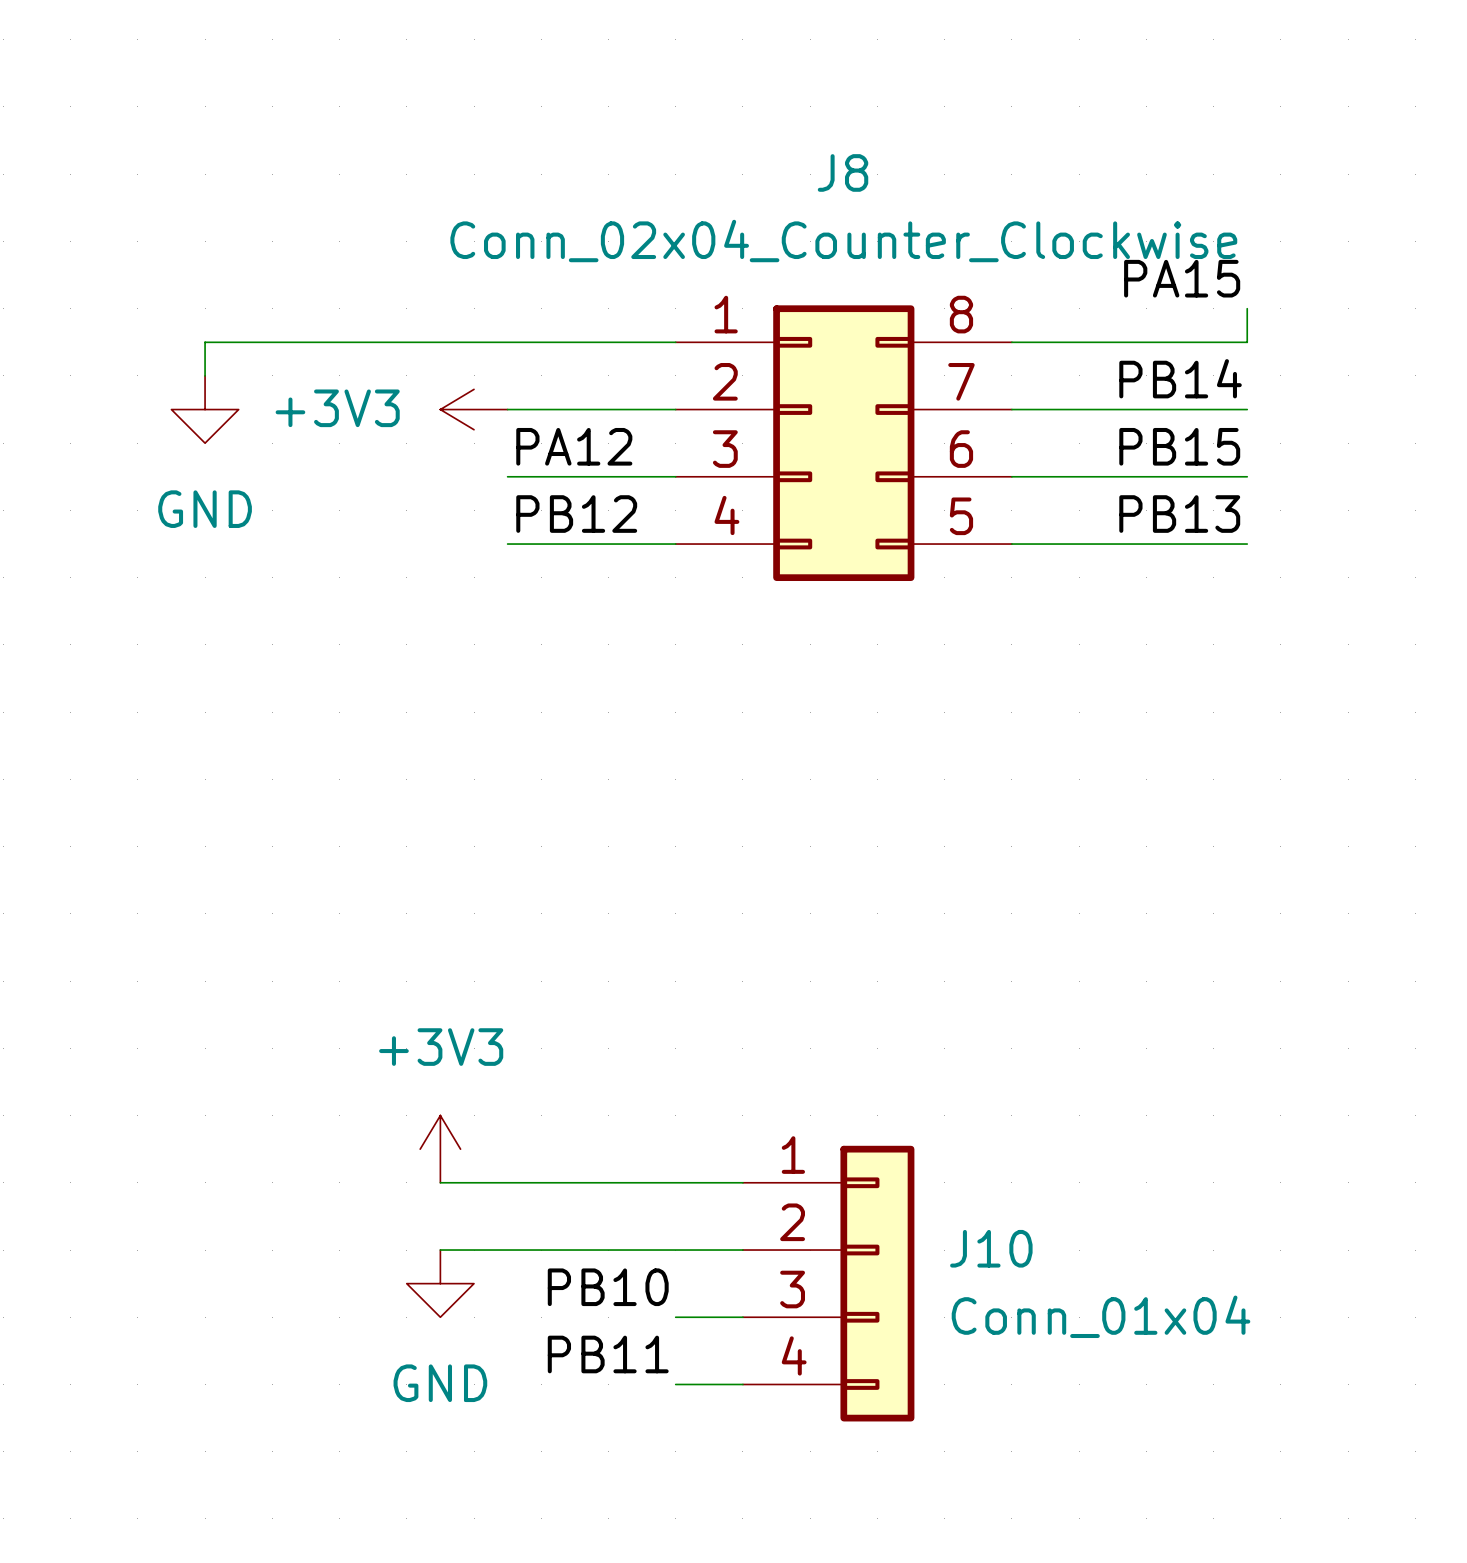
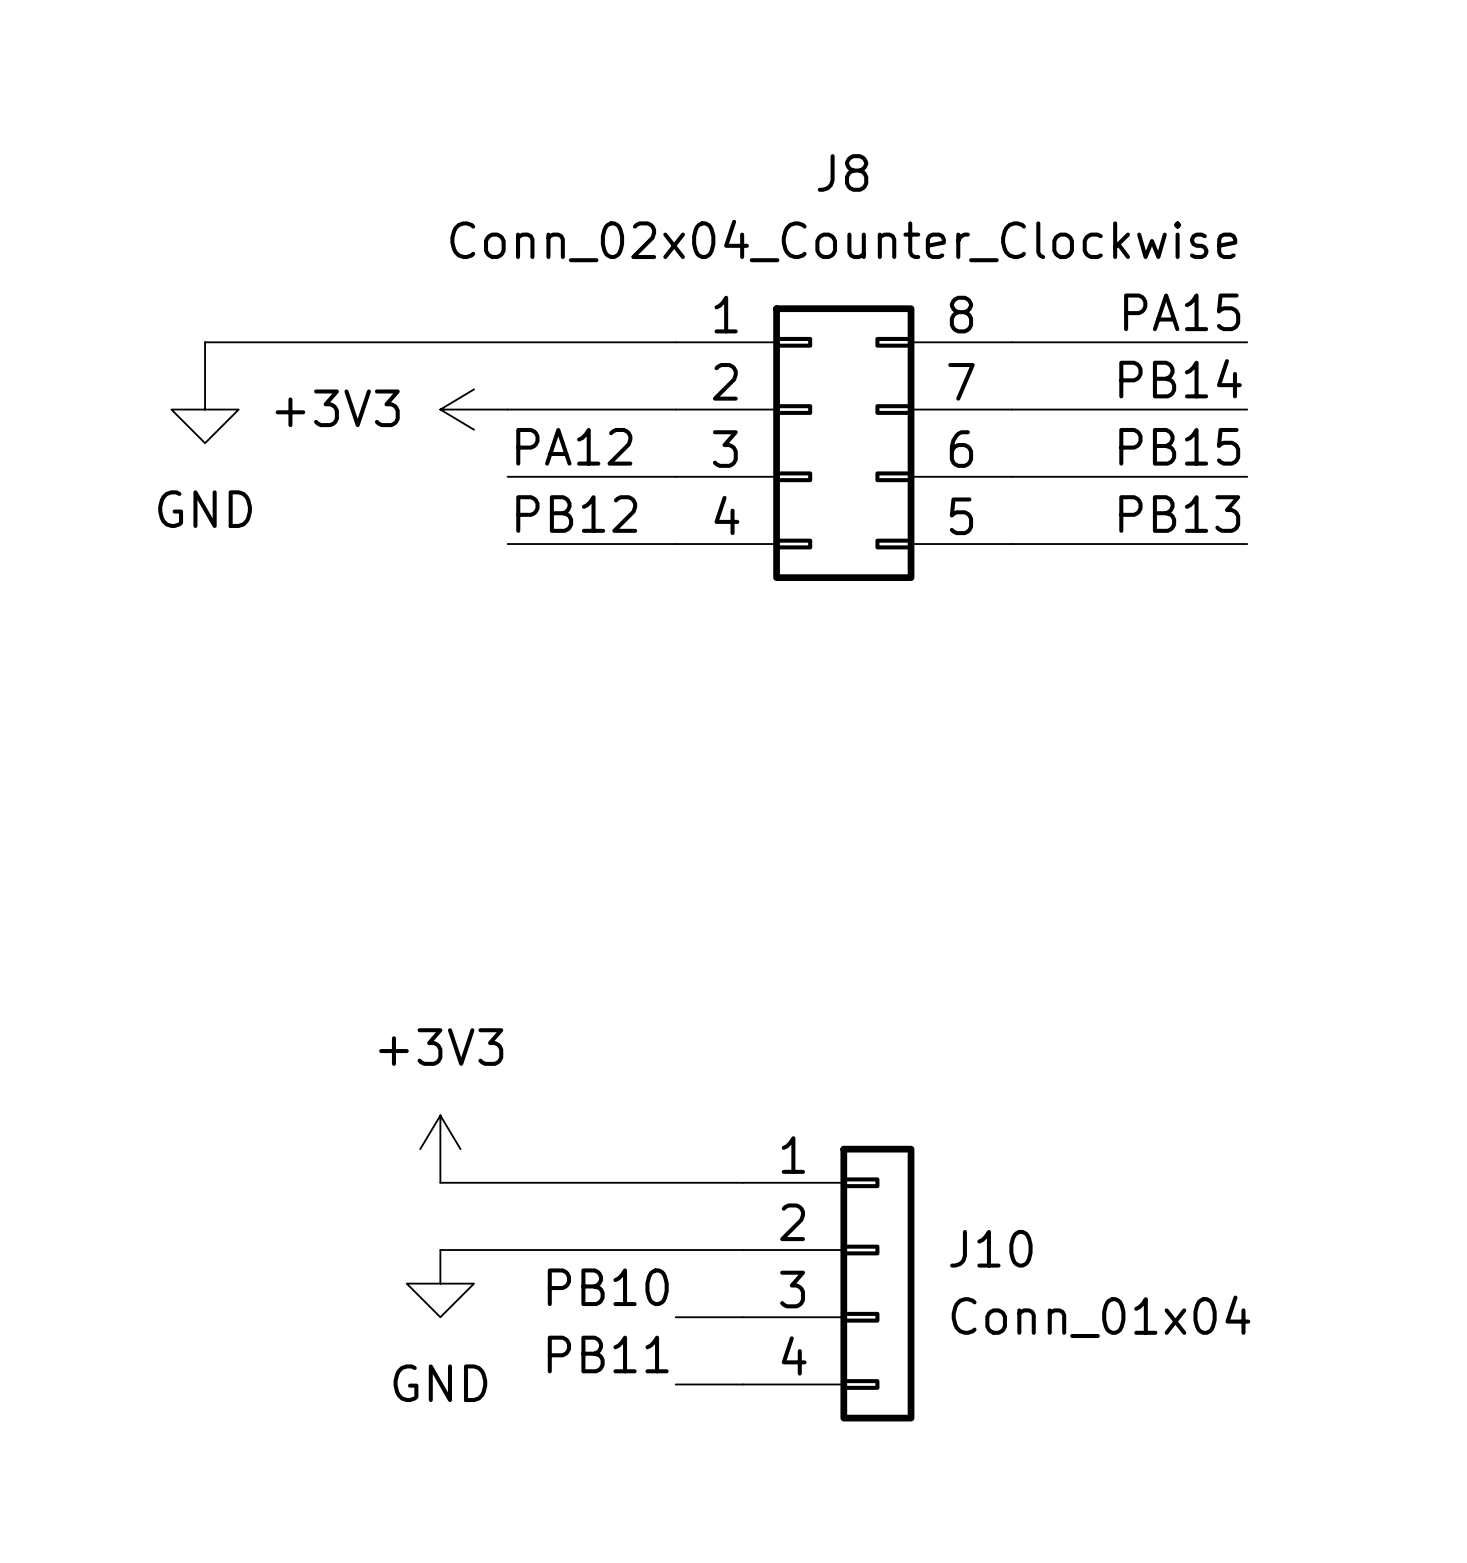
label position: PA15 (1182, 278) -> PA15 (1182, 312)
wire: (1247, 308) (1247, 342) -> none

